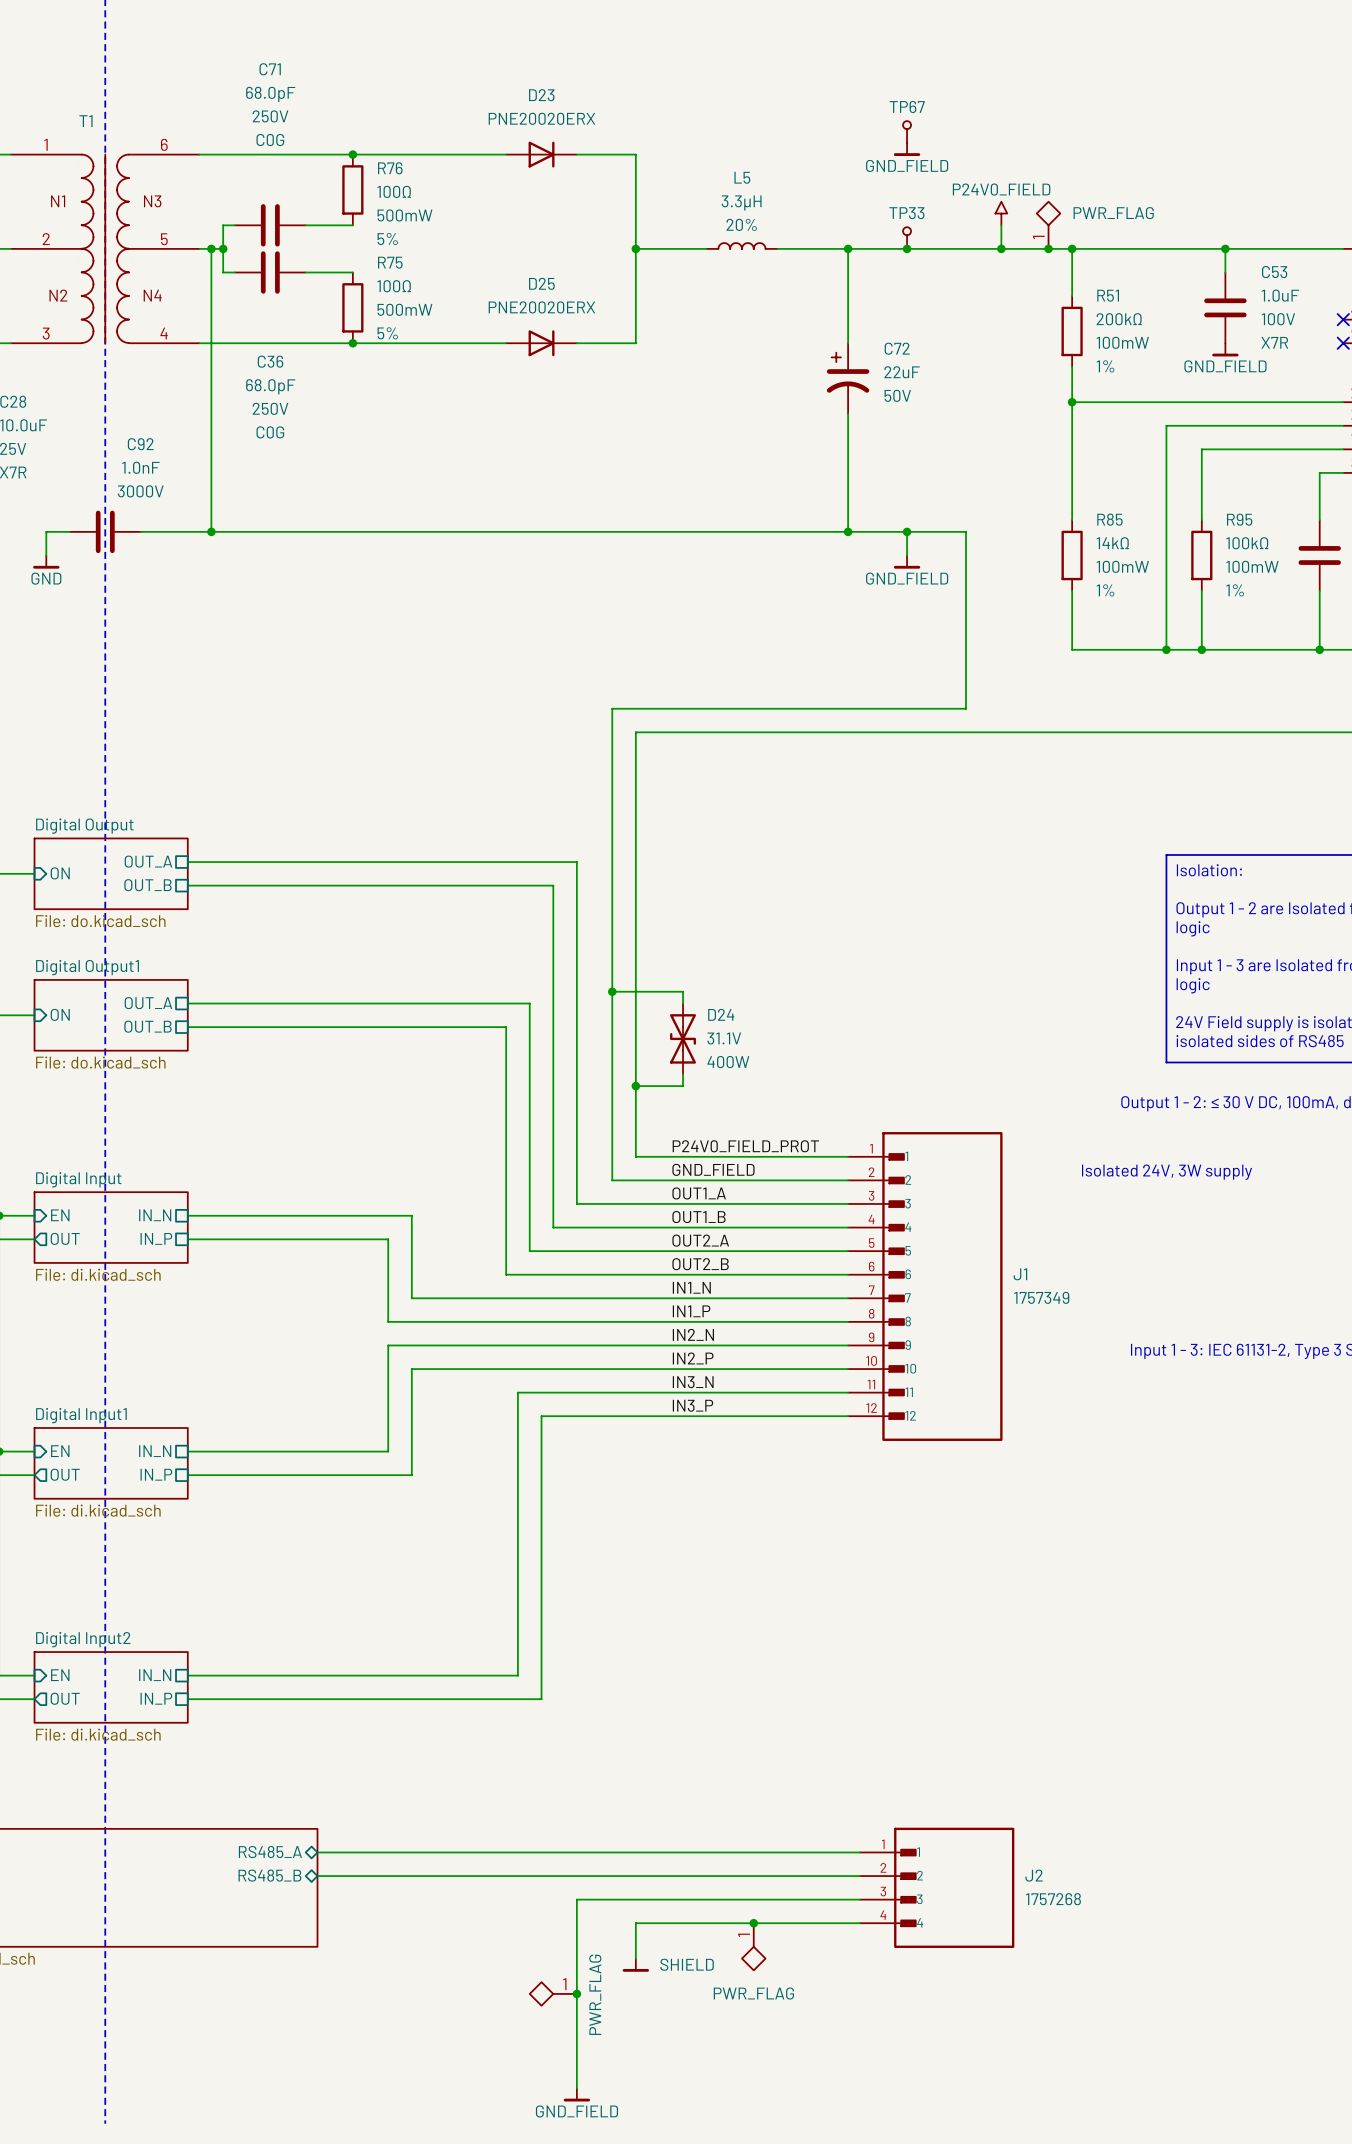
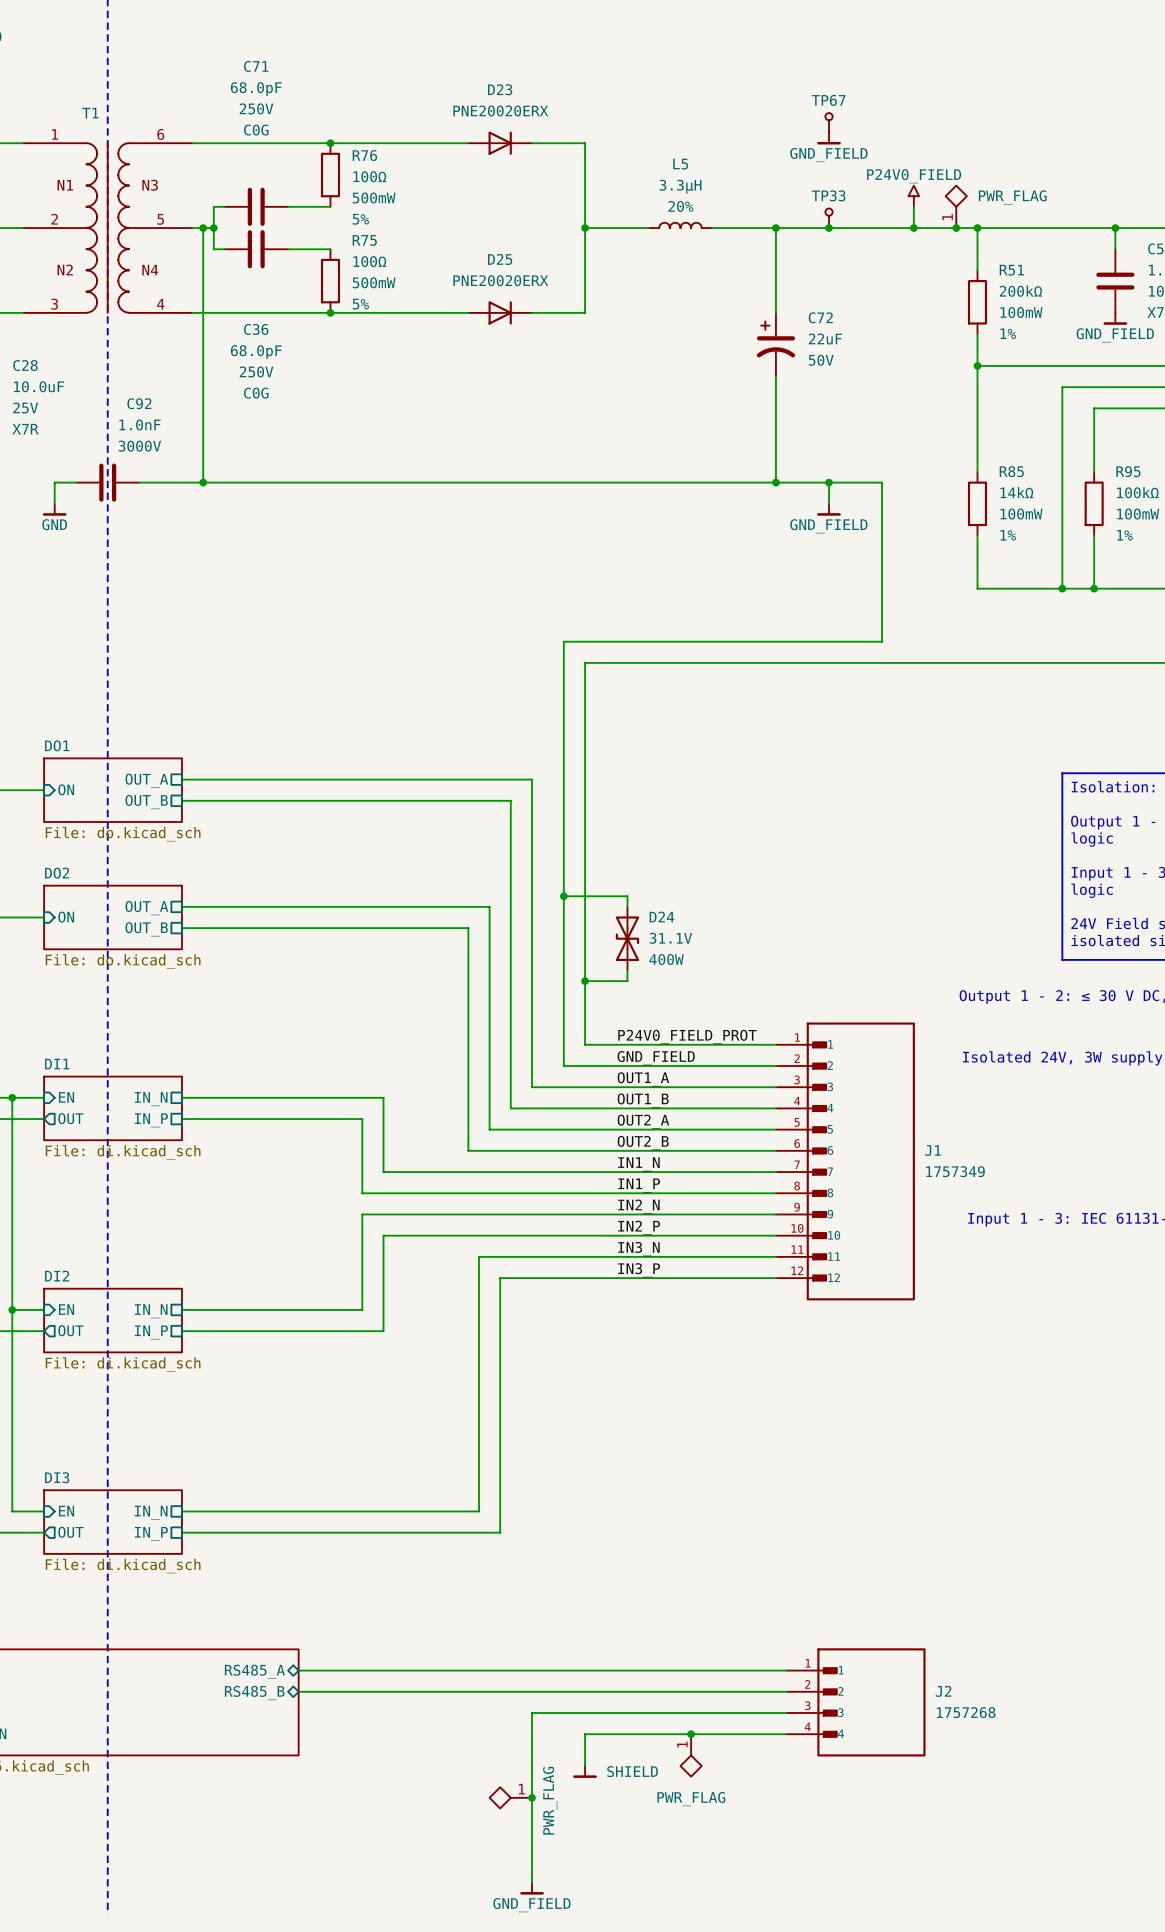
sheet Digital Output name: Digital Output (84, 826) -> DO1 (57, 745)
sheet Digital Output1 name: Digital Output1 (87, 967) -> DO2 (57, 873)
sheet Digital Input name: Digital Input (78, 1179) -> DI1 (57, 1064)
sheet Digital Input1 name: Digital Input1 (81, 1415) -> DI2 (57, 1276)
sheet Digital Input2 name: Digital Input2 (83, 1639) -> DI3 (57, 1477)

